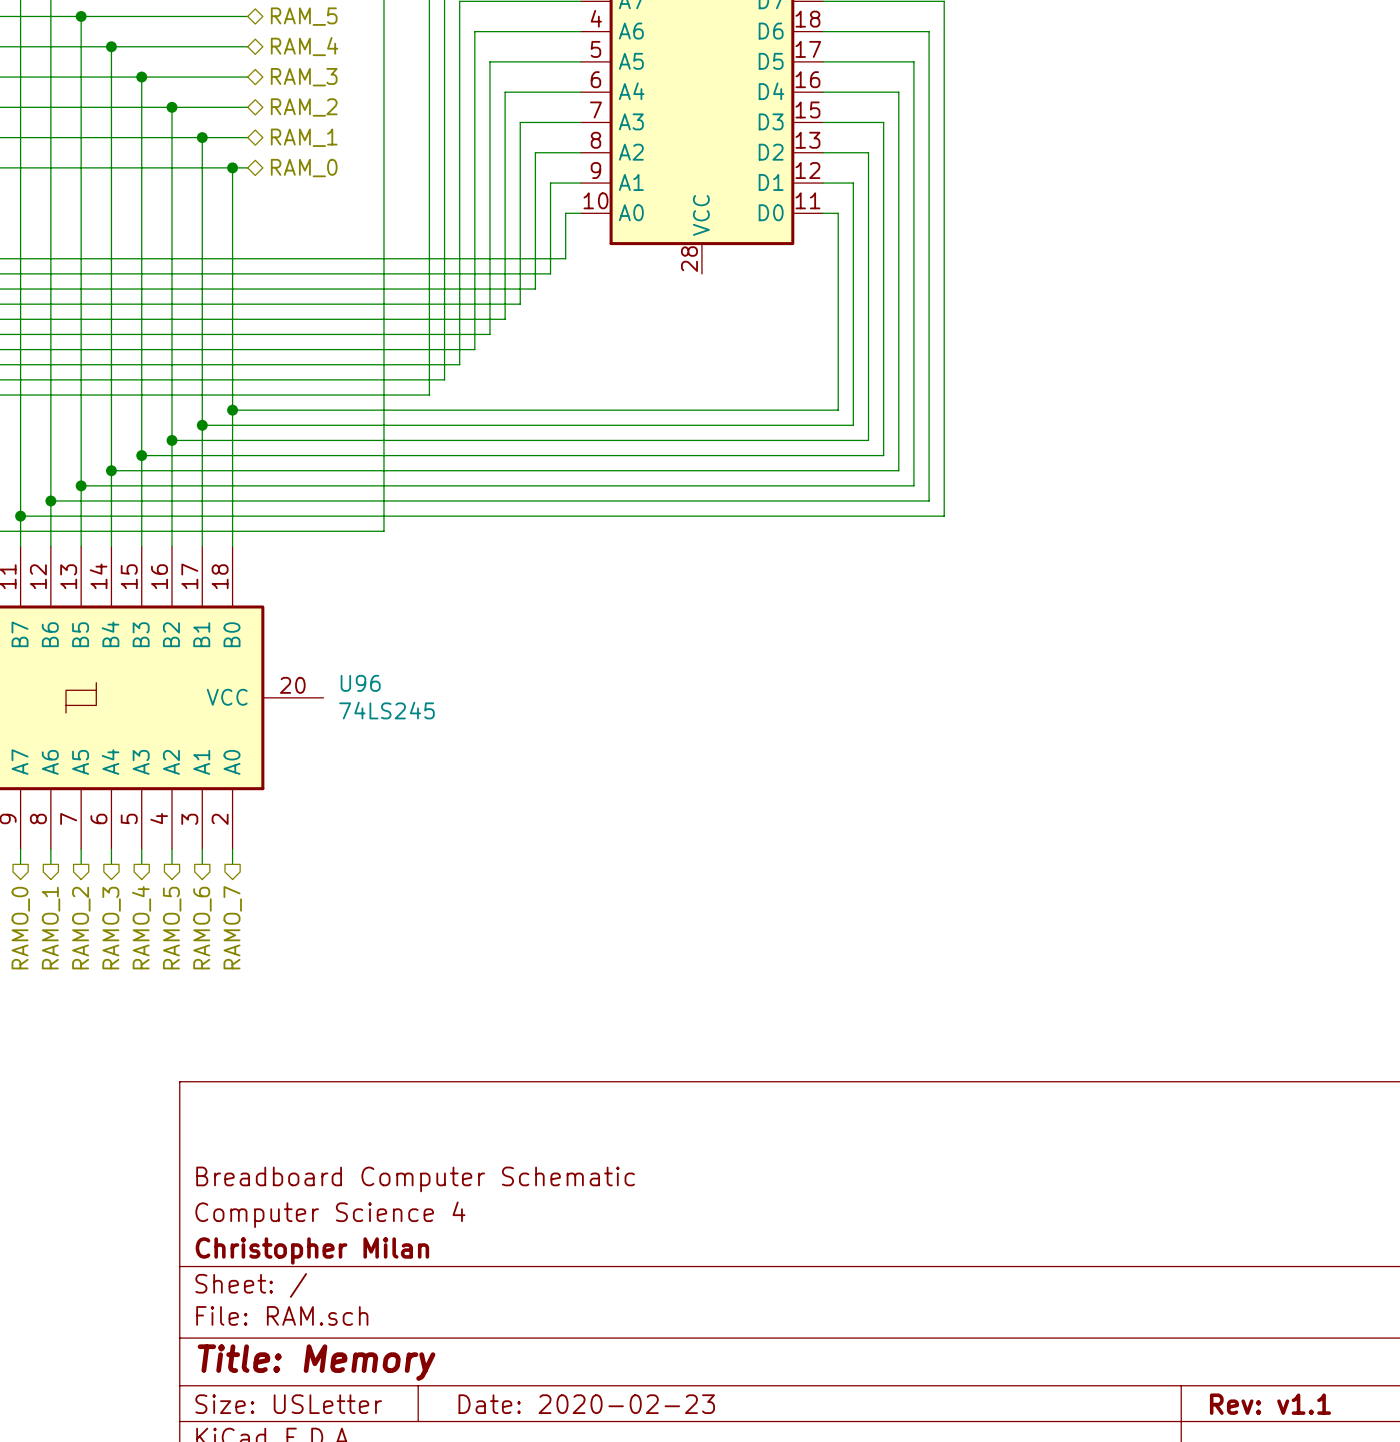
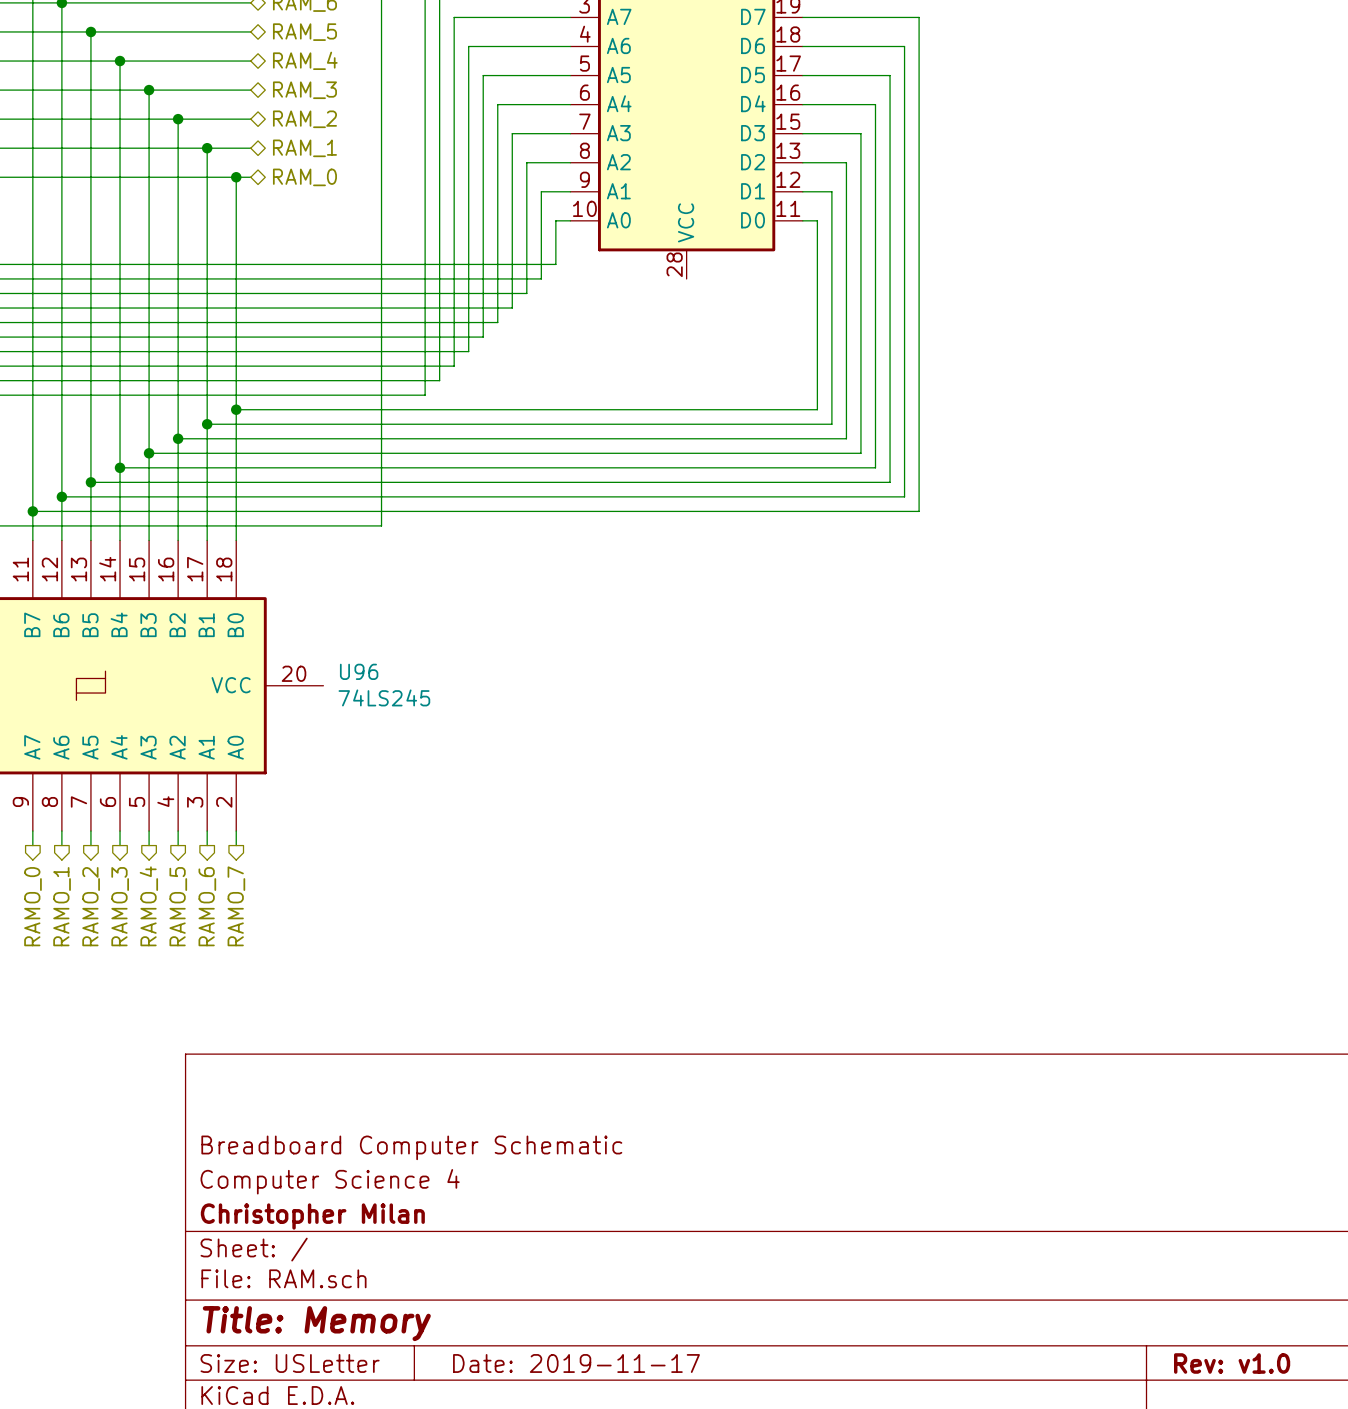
title block: Date: 2020-02-23 (586, 1404) -> Date: 2019-11-17 (576, 1363)
title block: Rev: v1.1 (1270, 1404) -> Rev: v1.0 (1232, 1363)

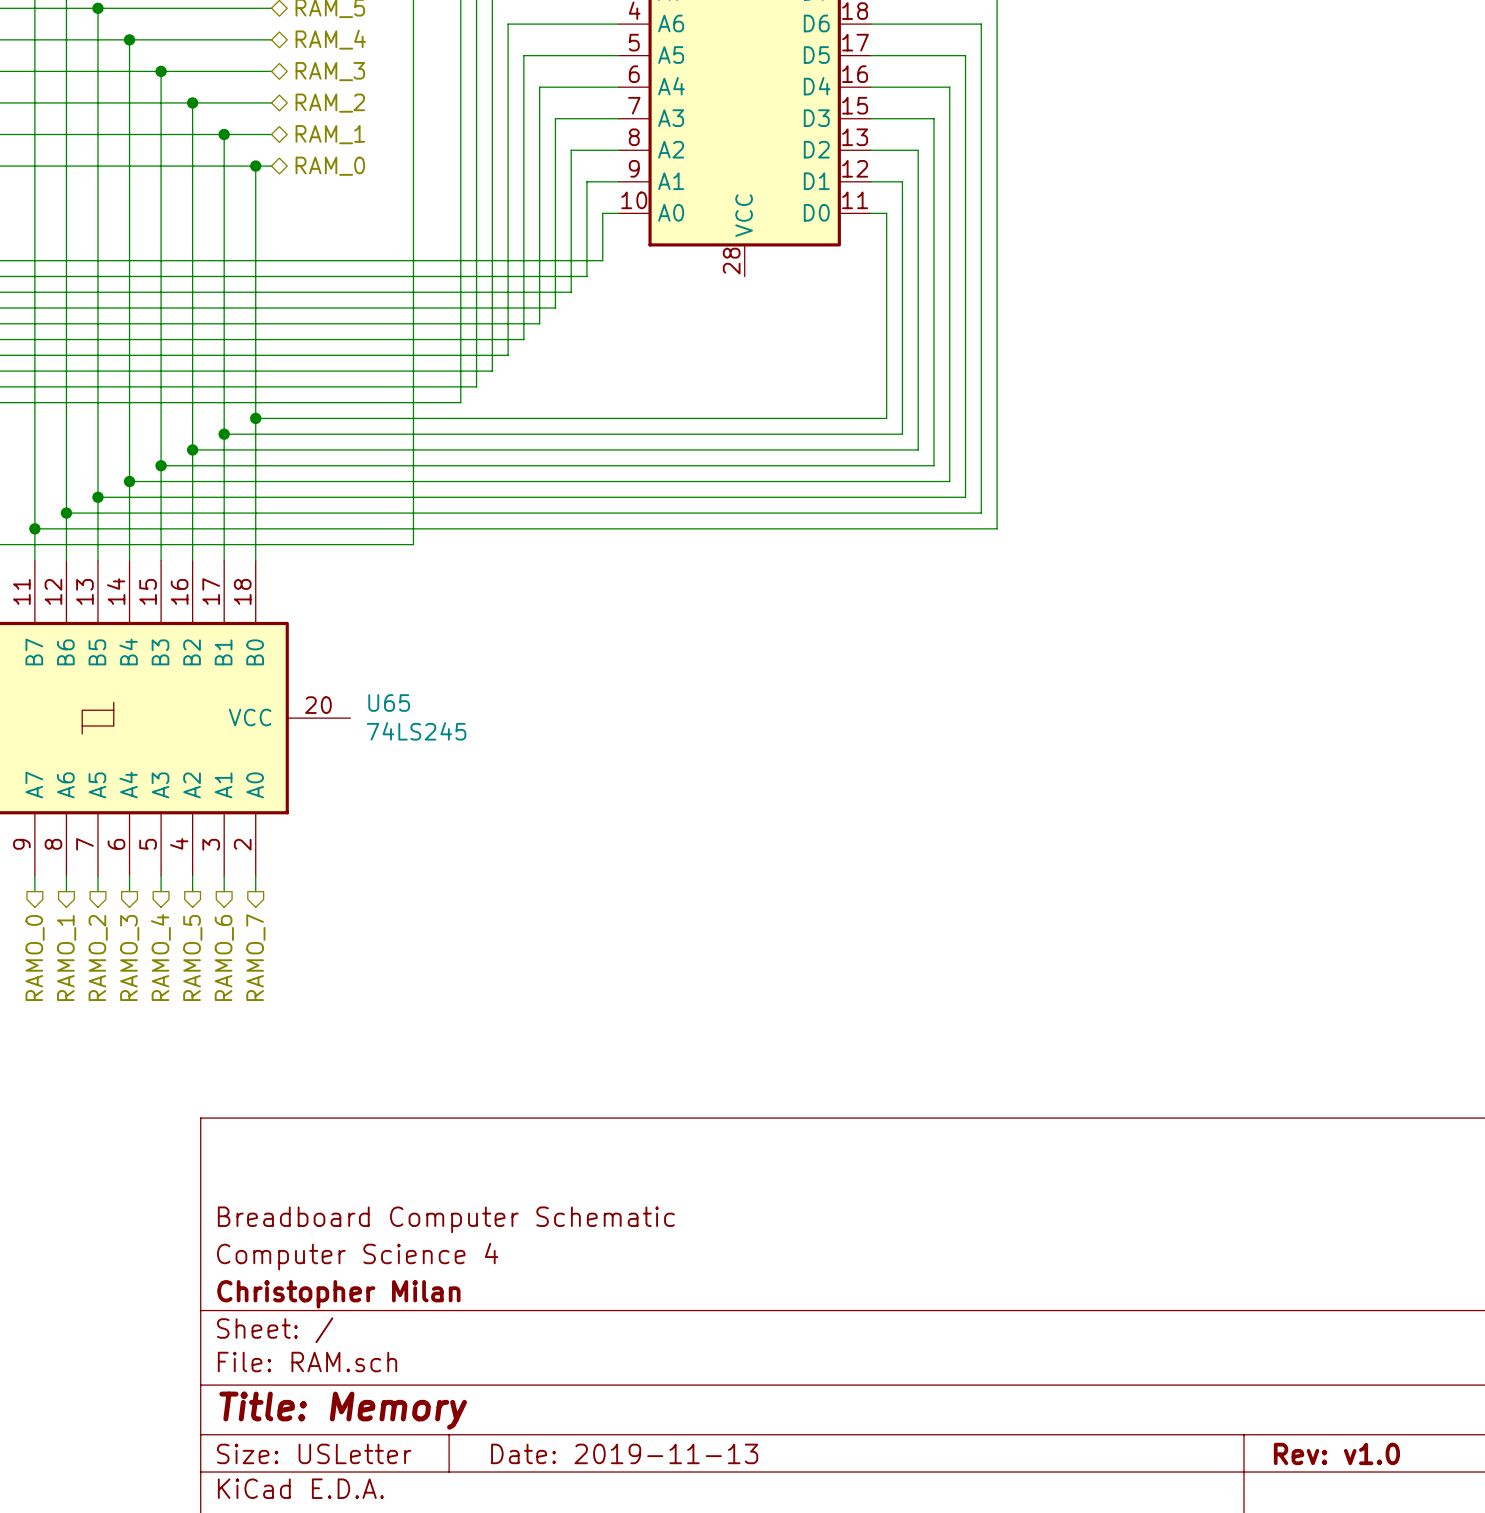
U96 name: U96 (359, 671) -> U65 (389, 703)
title block: Date: 2019-11-17 (576, 1363) -> Date: 2019-11-13 (624, 1453)

